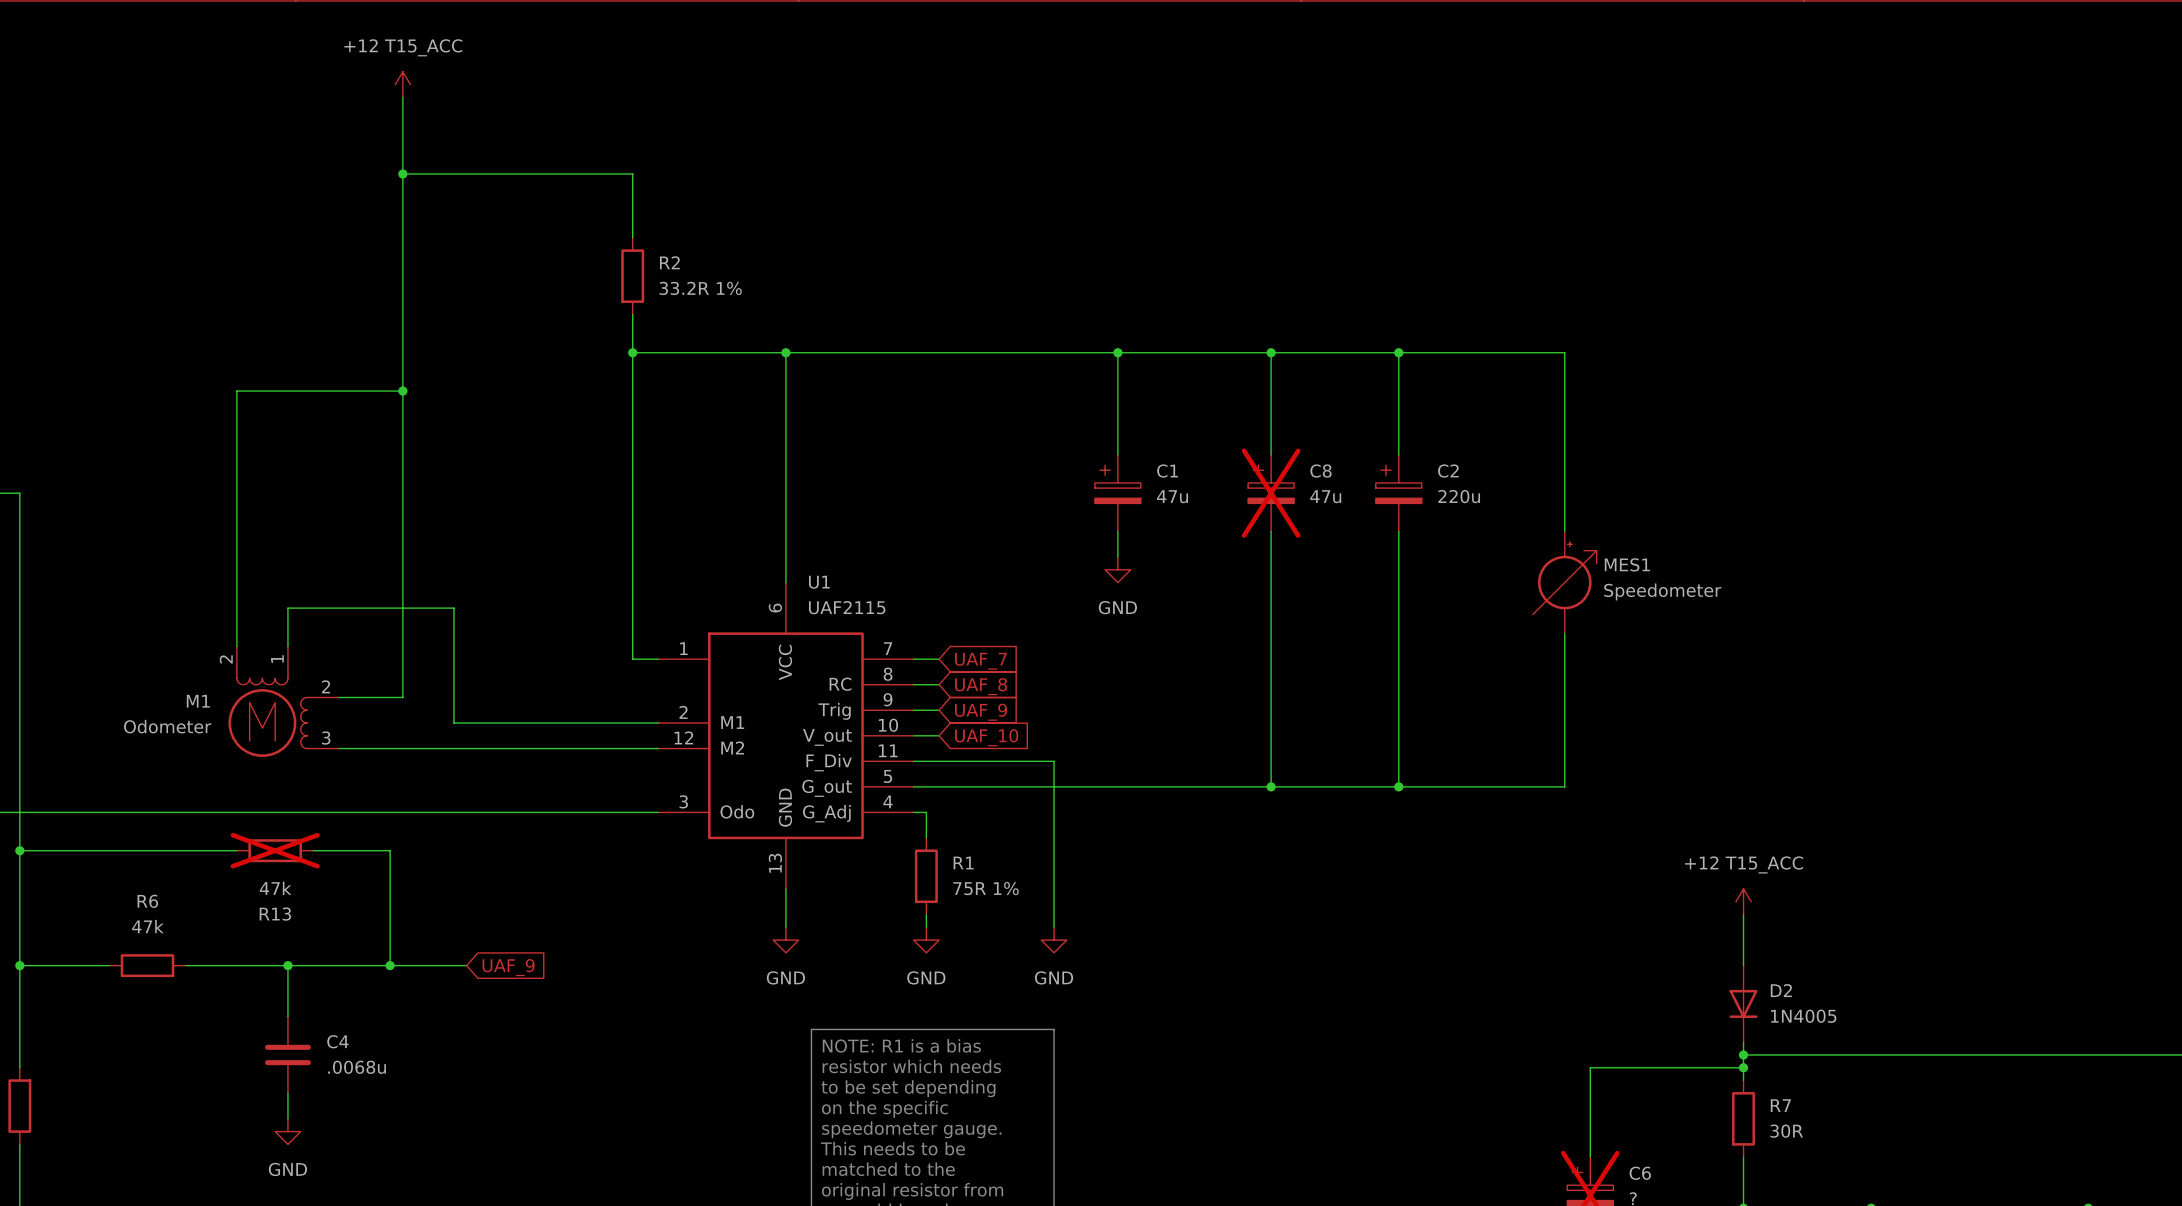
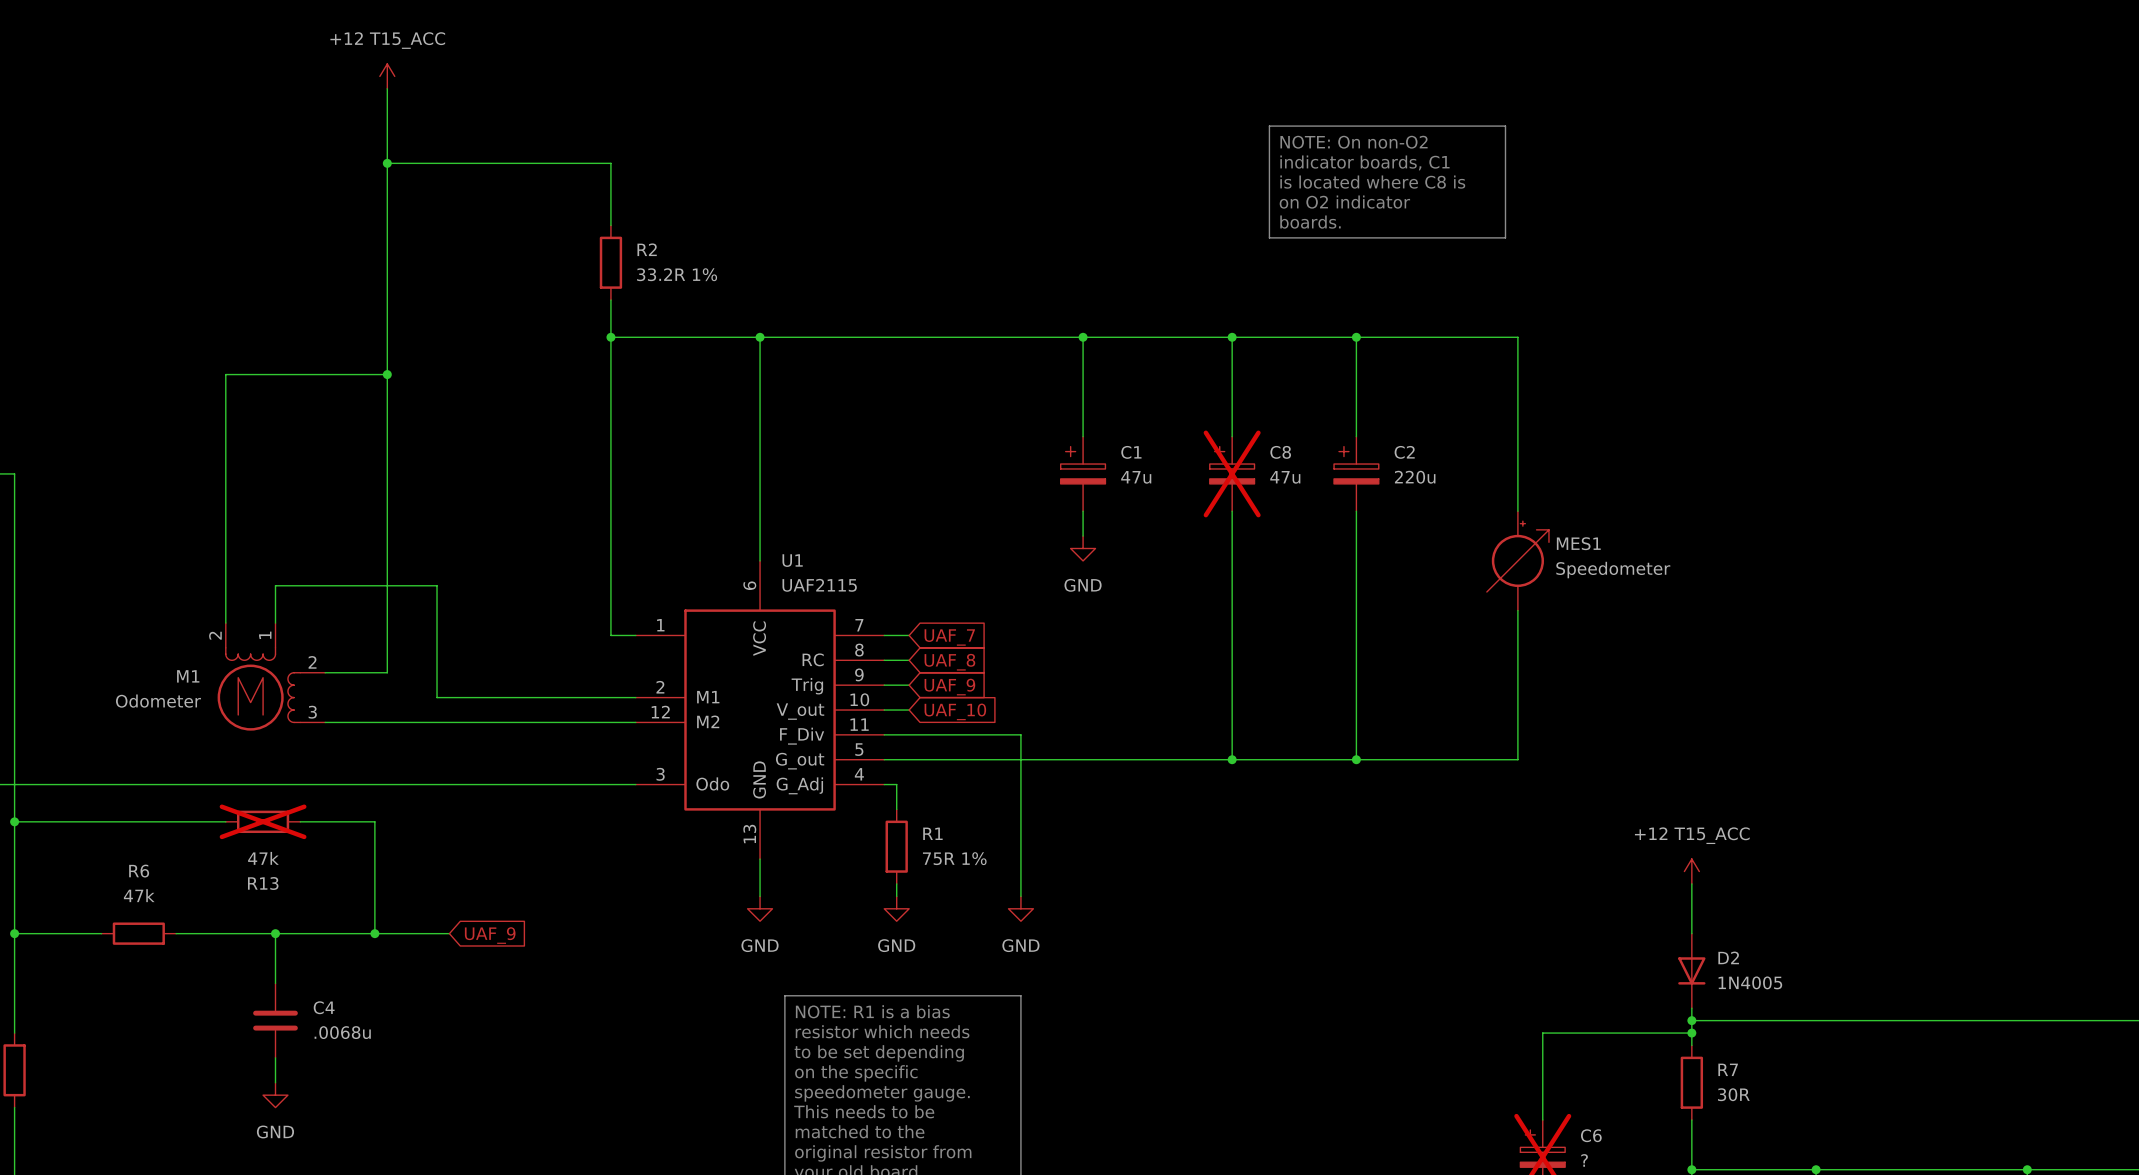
line: none -> (1269, 126) (1505, 126) (1505, 237) (1269, 237) (1269, 126)
text: none -> NOTE: On non-O2 (1354, 142)
text: none -> indicator boards, C1 (1364, 162)
text: none -> is located where C8 is (1372, 182)
text: none -> on O2 indicator (1344, 202)
text: none -> boards. (1310, 222)

